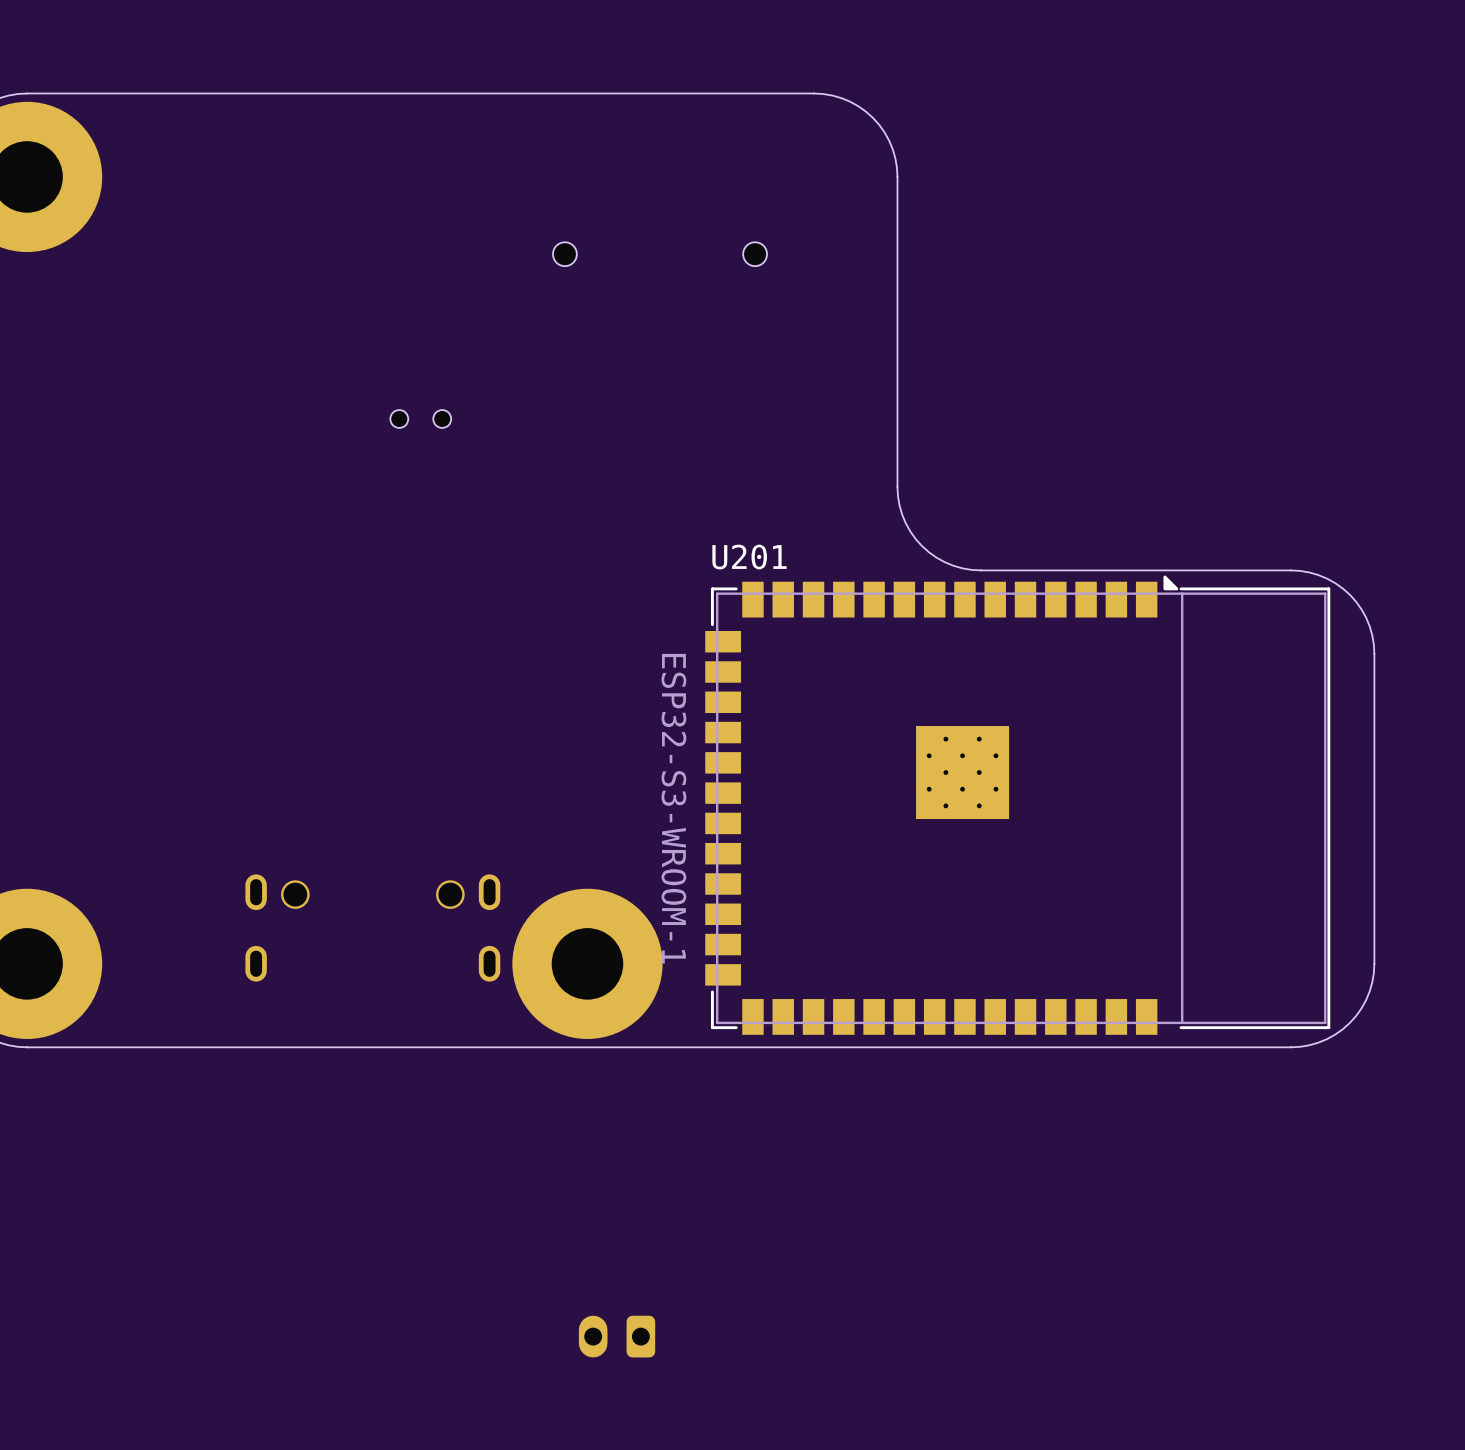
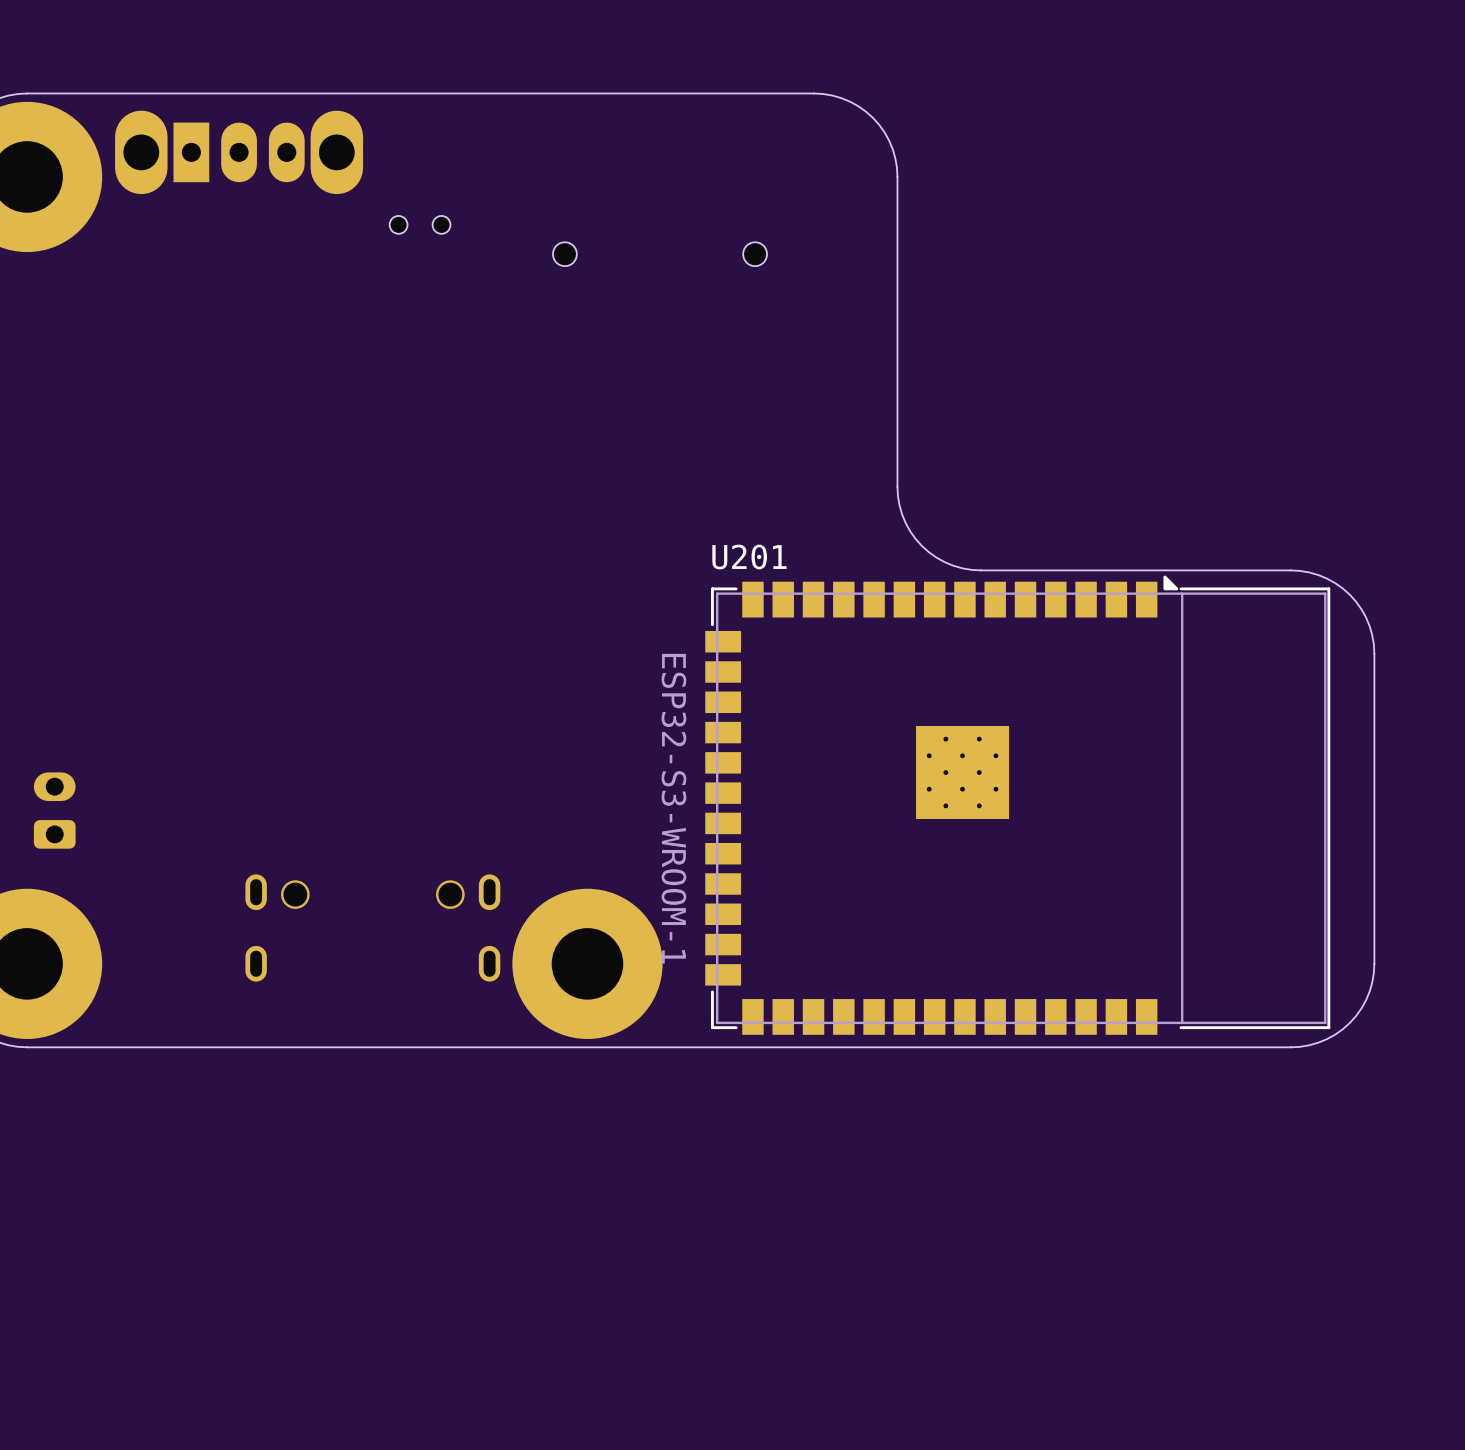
part: none -> (239, 152)
part position: (420, 418) -> (420, 224)
part: none -> (54, 810)
part: (617, 1336) -> none

